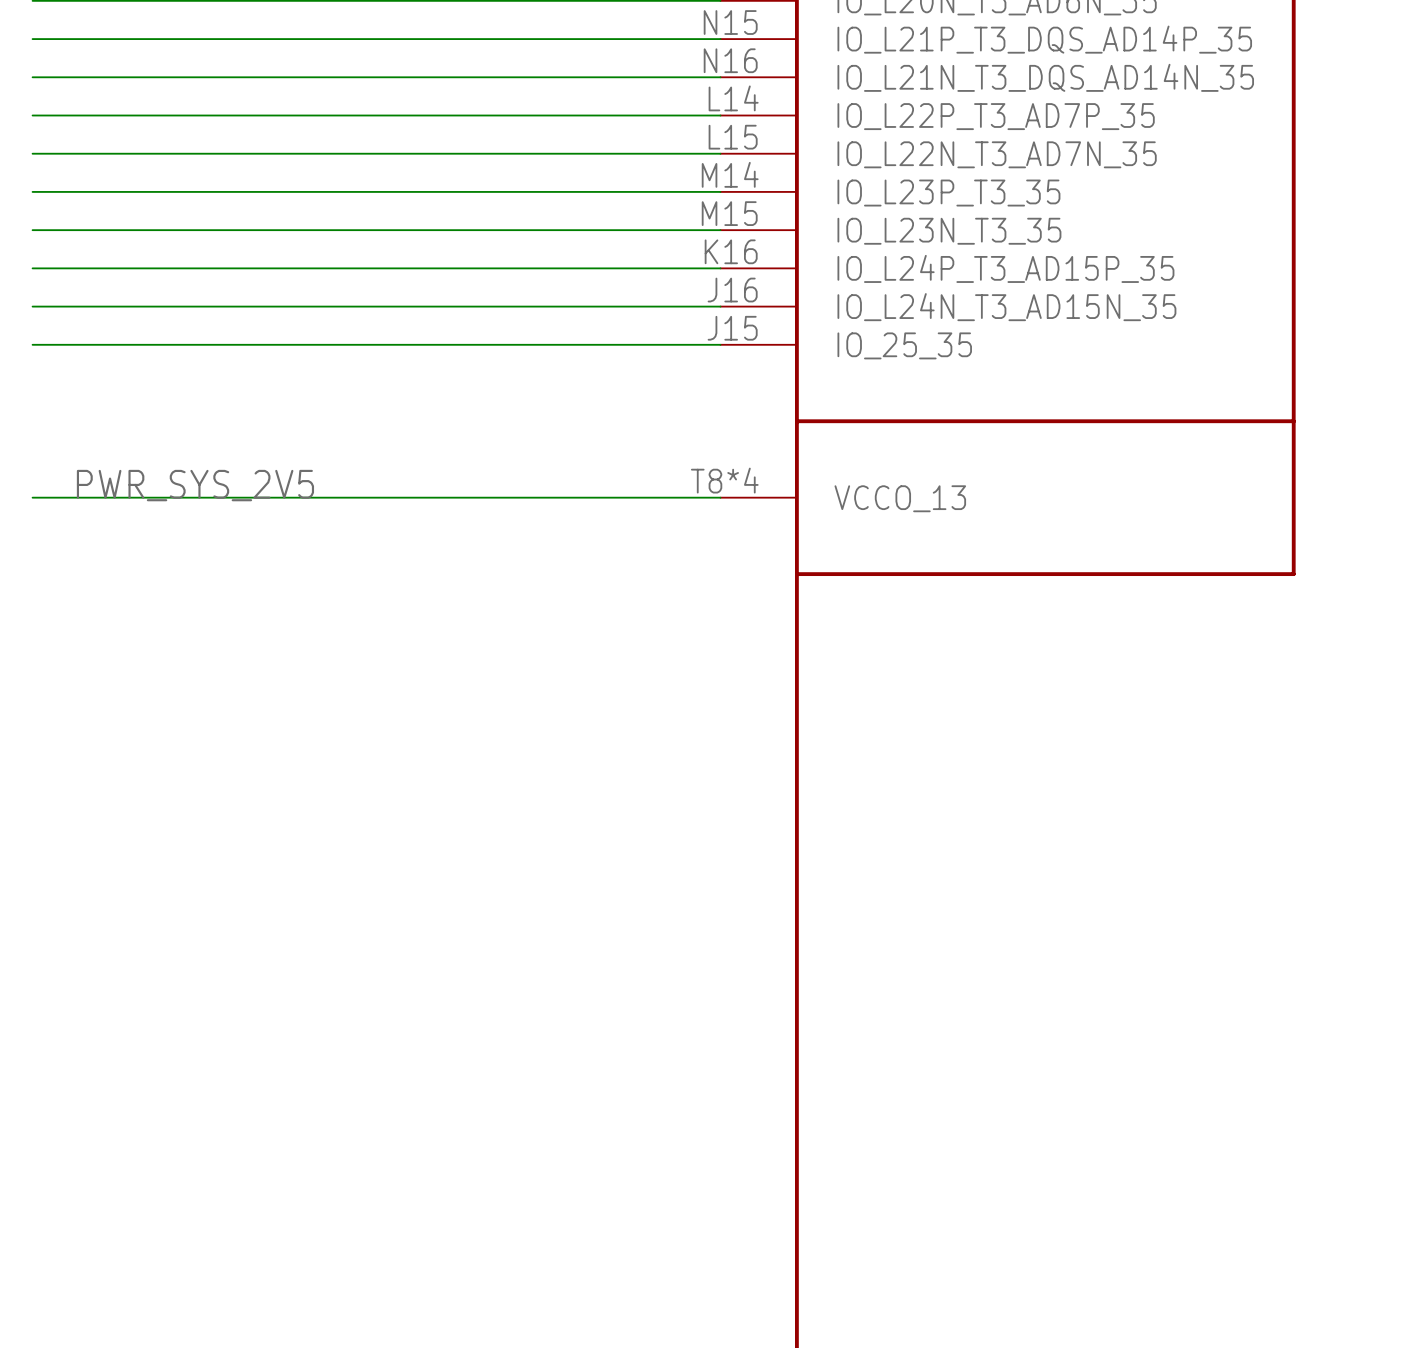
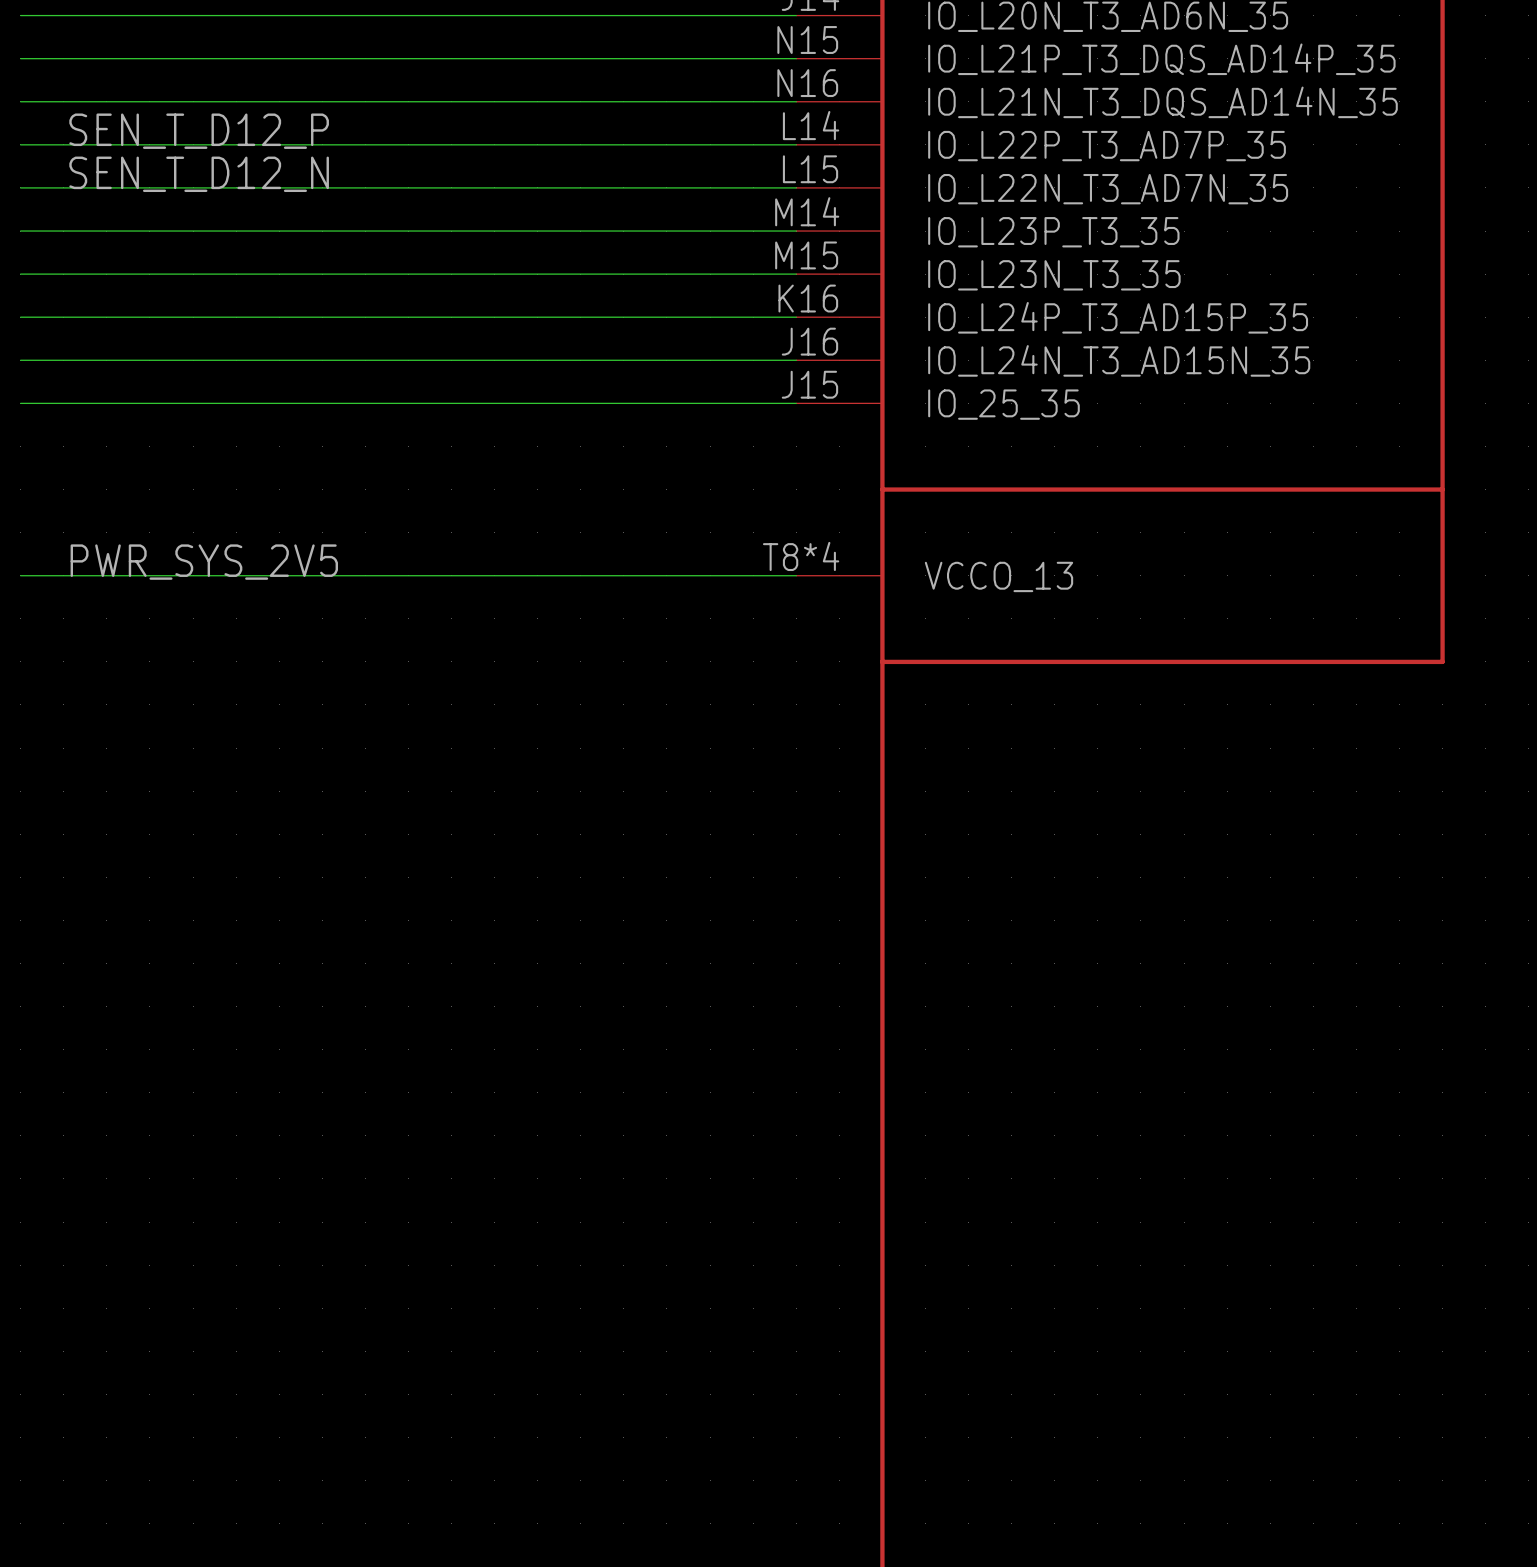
label: none -> SEN_T_D12_P (199, 131)
label: none -> SEN_T_D12_N (199, 174)

